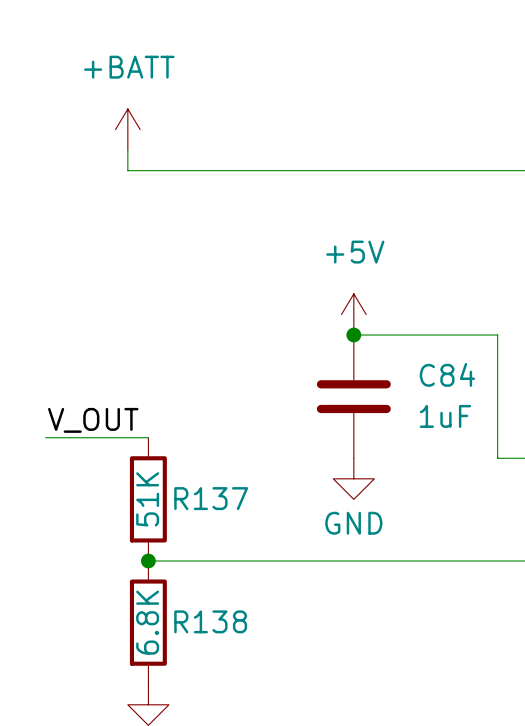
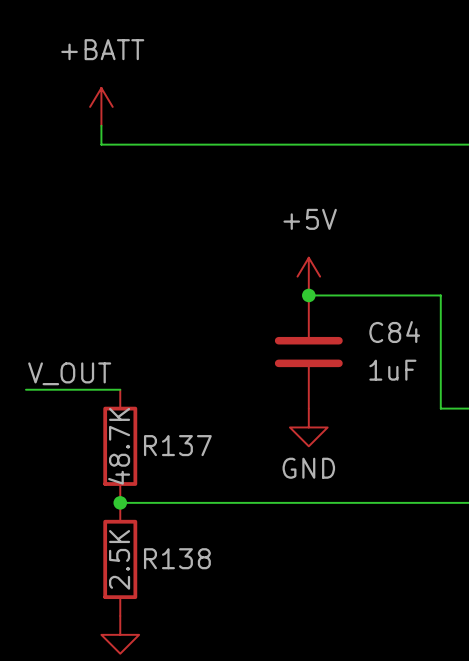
R137 value: 51K (147, 499) -> 48.7K (119, 446)
R138 value: 6.8K (147, 622) -> 2.5K (119, 559)

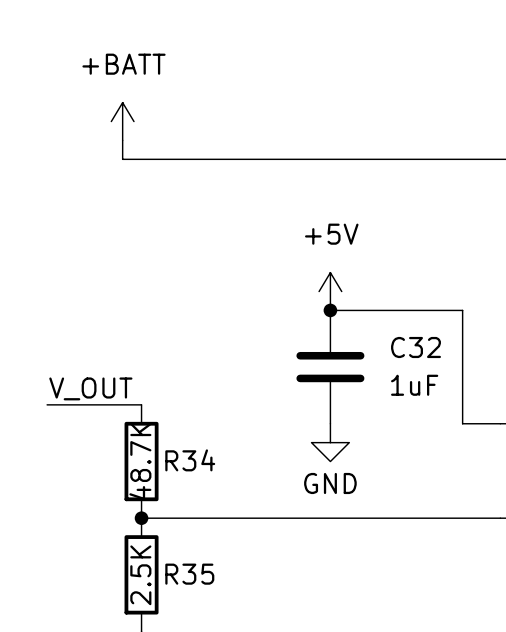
C84 name: C84 (394, 332) -> C32 (416, 347)
R137 name: R137 (177, 445) -> R34 (190, 460)
R138 name: R138 (177, 558) -> R35 (189, 574)

